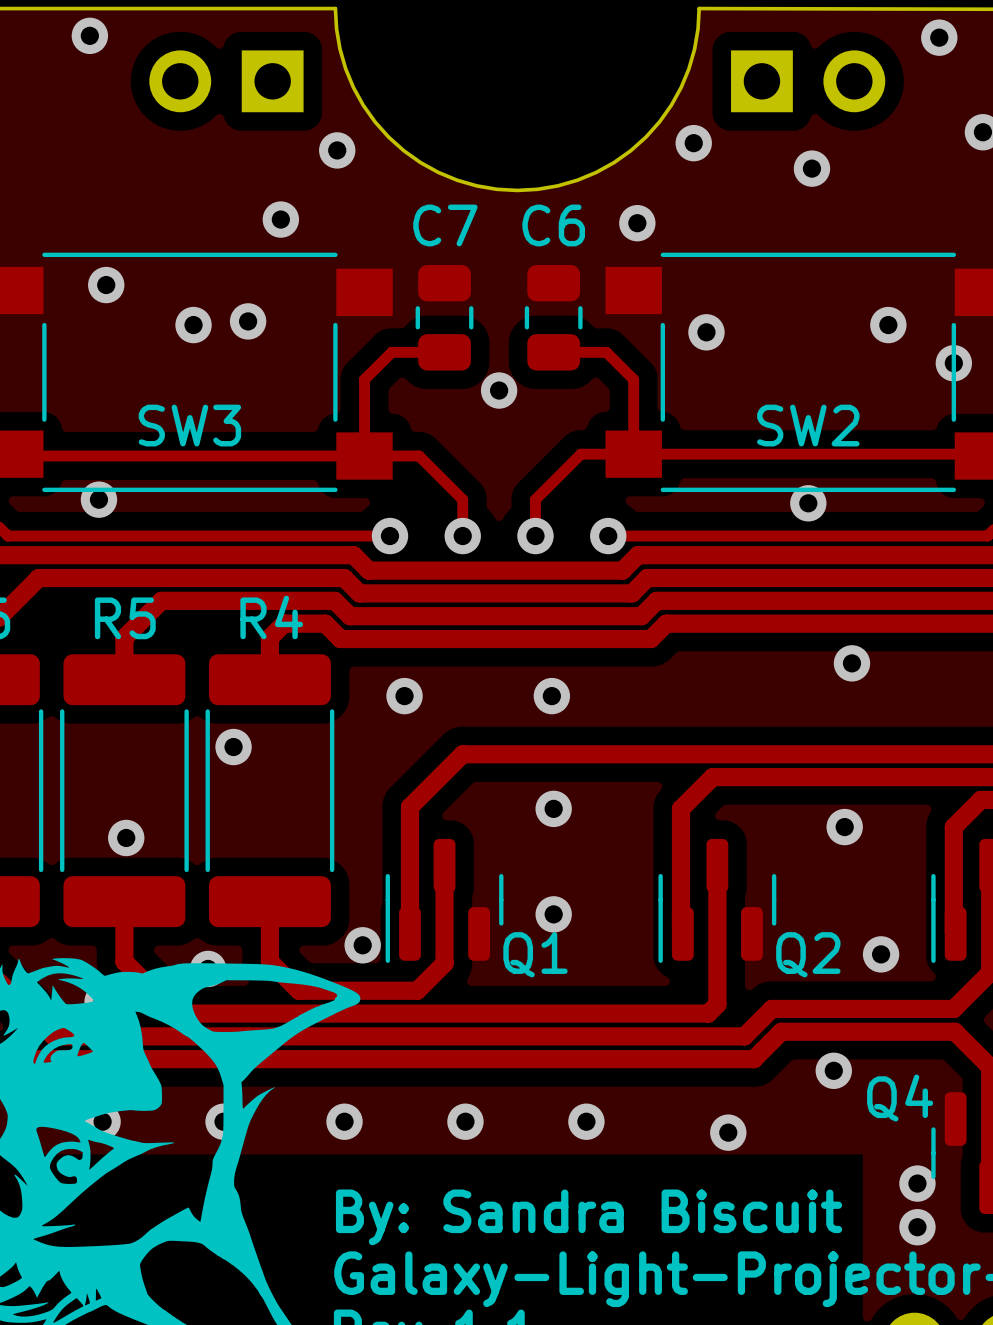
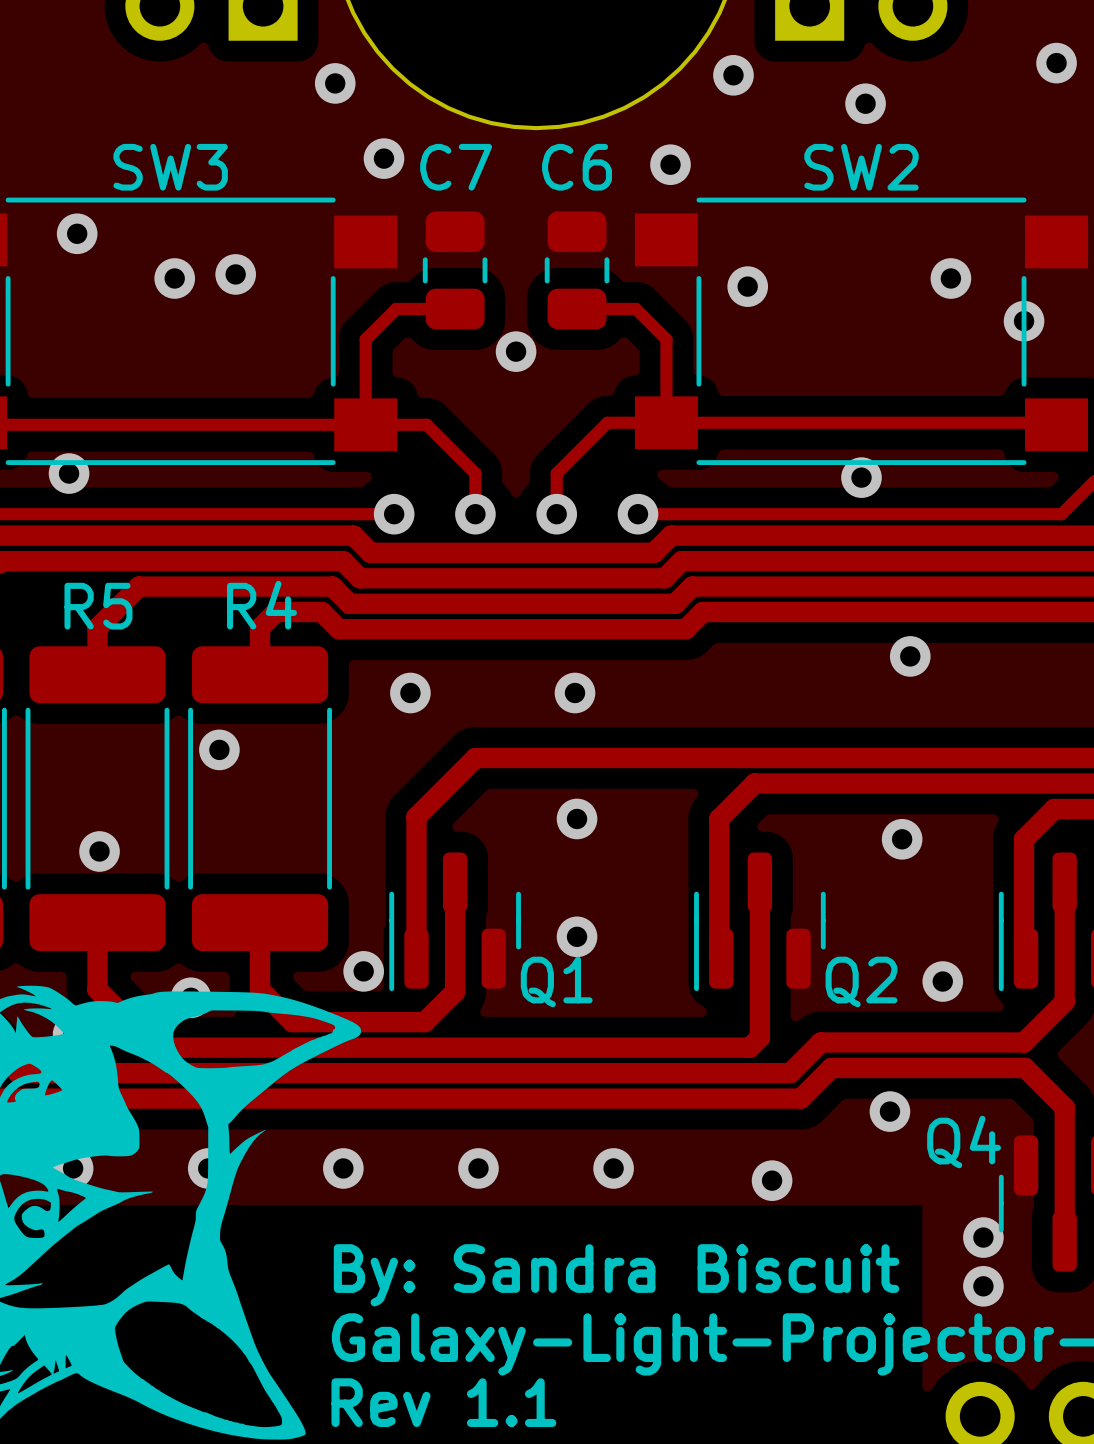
via position: (280, 219) -> (384, 158)
SW3 name position: SW3 (189, 425) -> SW3 (170, 167)
SW2 name position: SW2 (808, 425) -> SW2 (861, 167)

